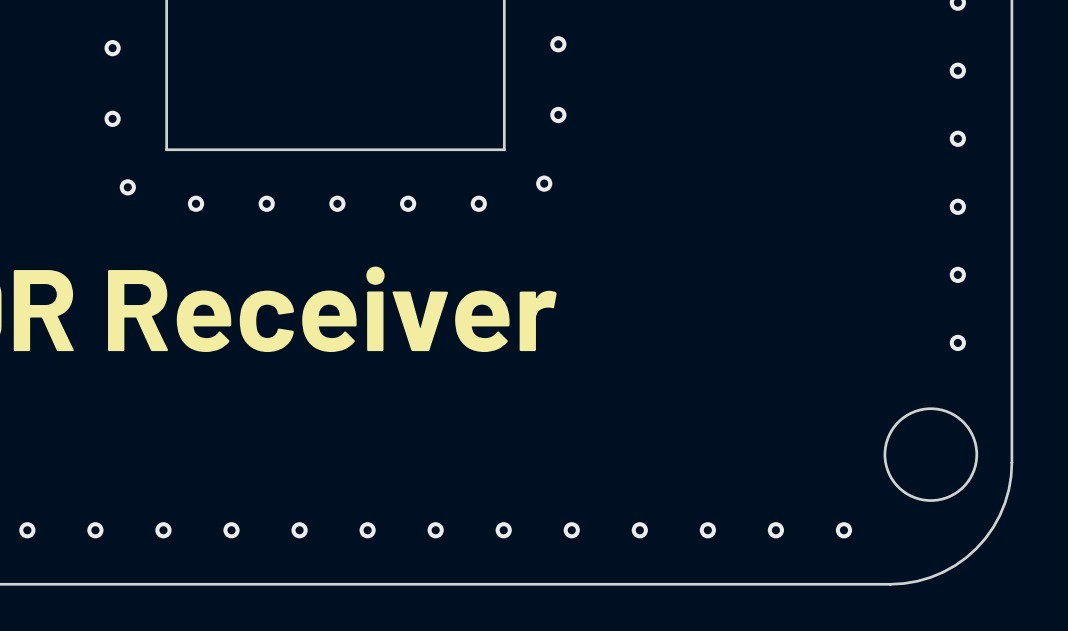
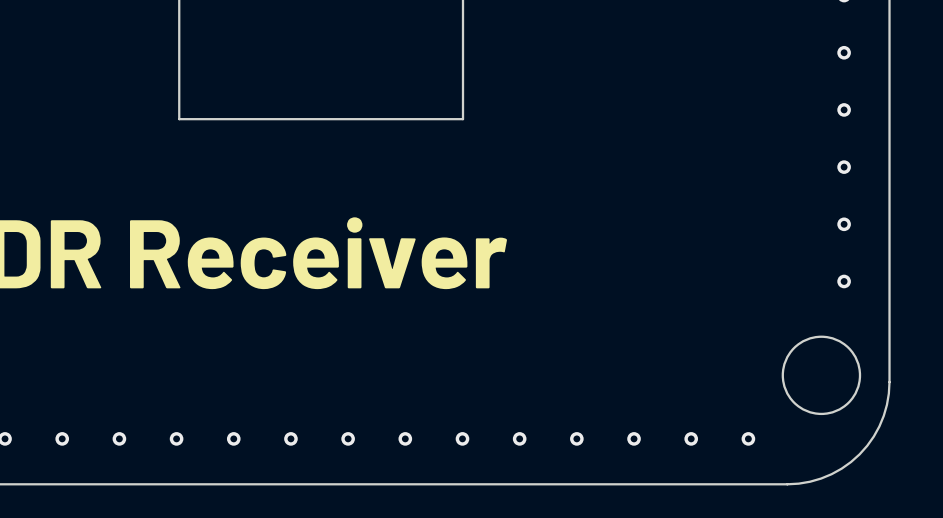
via: (558, 44) -> none
via: (112, 48) -> none
via: (558, 114) -> none
via: (112, 118) -> none
via: (544, 183) -> none
via: (127, 187) -> none
via: (196, 203) -> none
via: (266, 203) -> none
via: (337, 203) -> none
via: (408, 203) -> none
via: (478, 203) -> none

